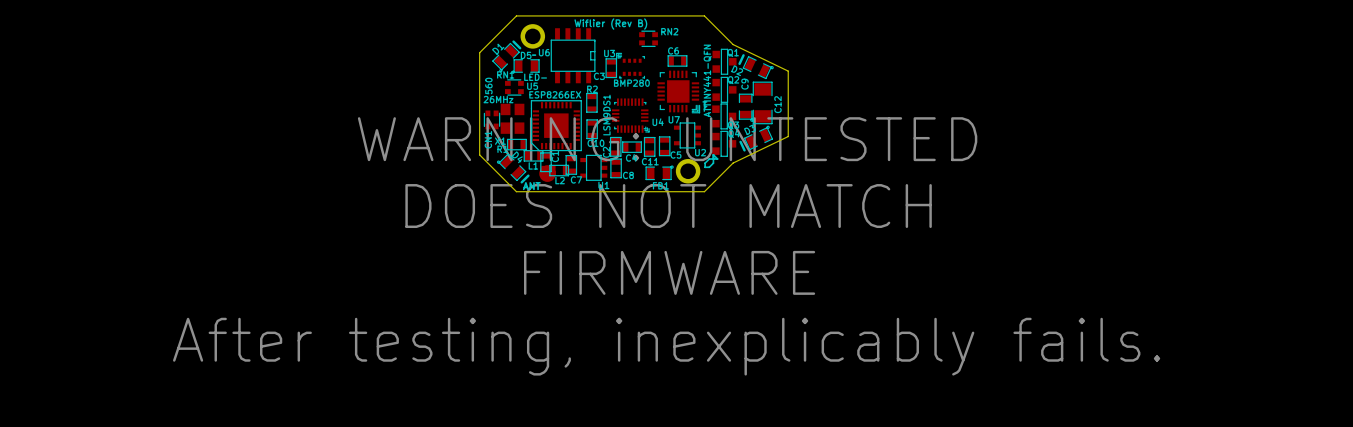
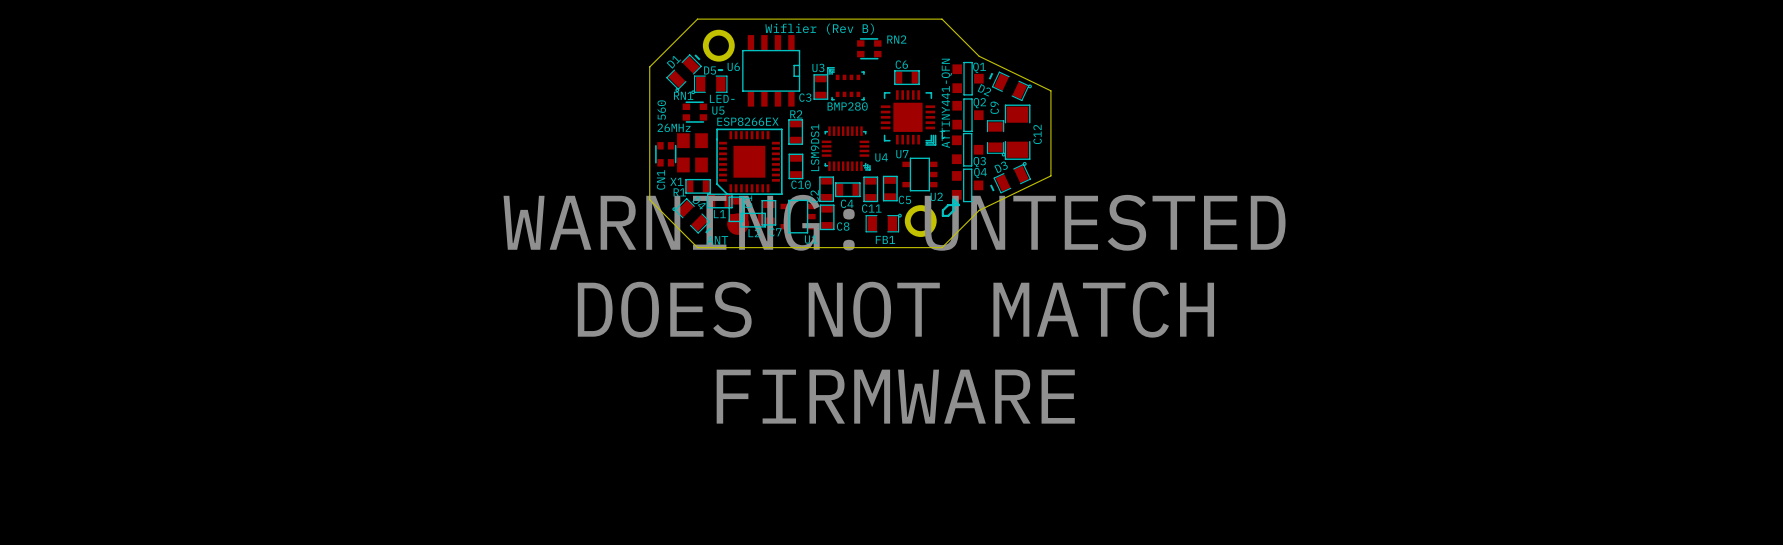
text position: WARNING: UNTESTED (667, 139) -> WARNING: UNTESTED (894, 222)
text position: DOES NOT MATCH (668, 206) -> DOES NOT MATCH (895, 309)
text position: FIRMWARE (669, 272) -> FIRMWARE (895, 396)
text: After testing, inexplicably fails. (666, 346) -> none

